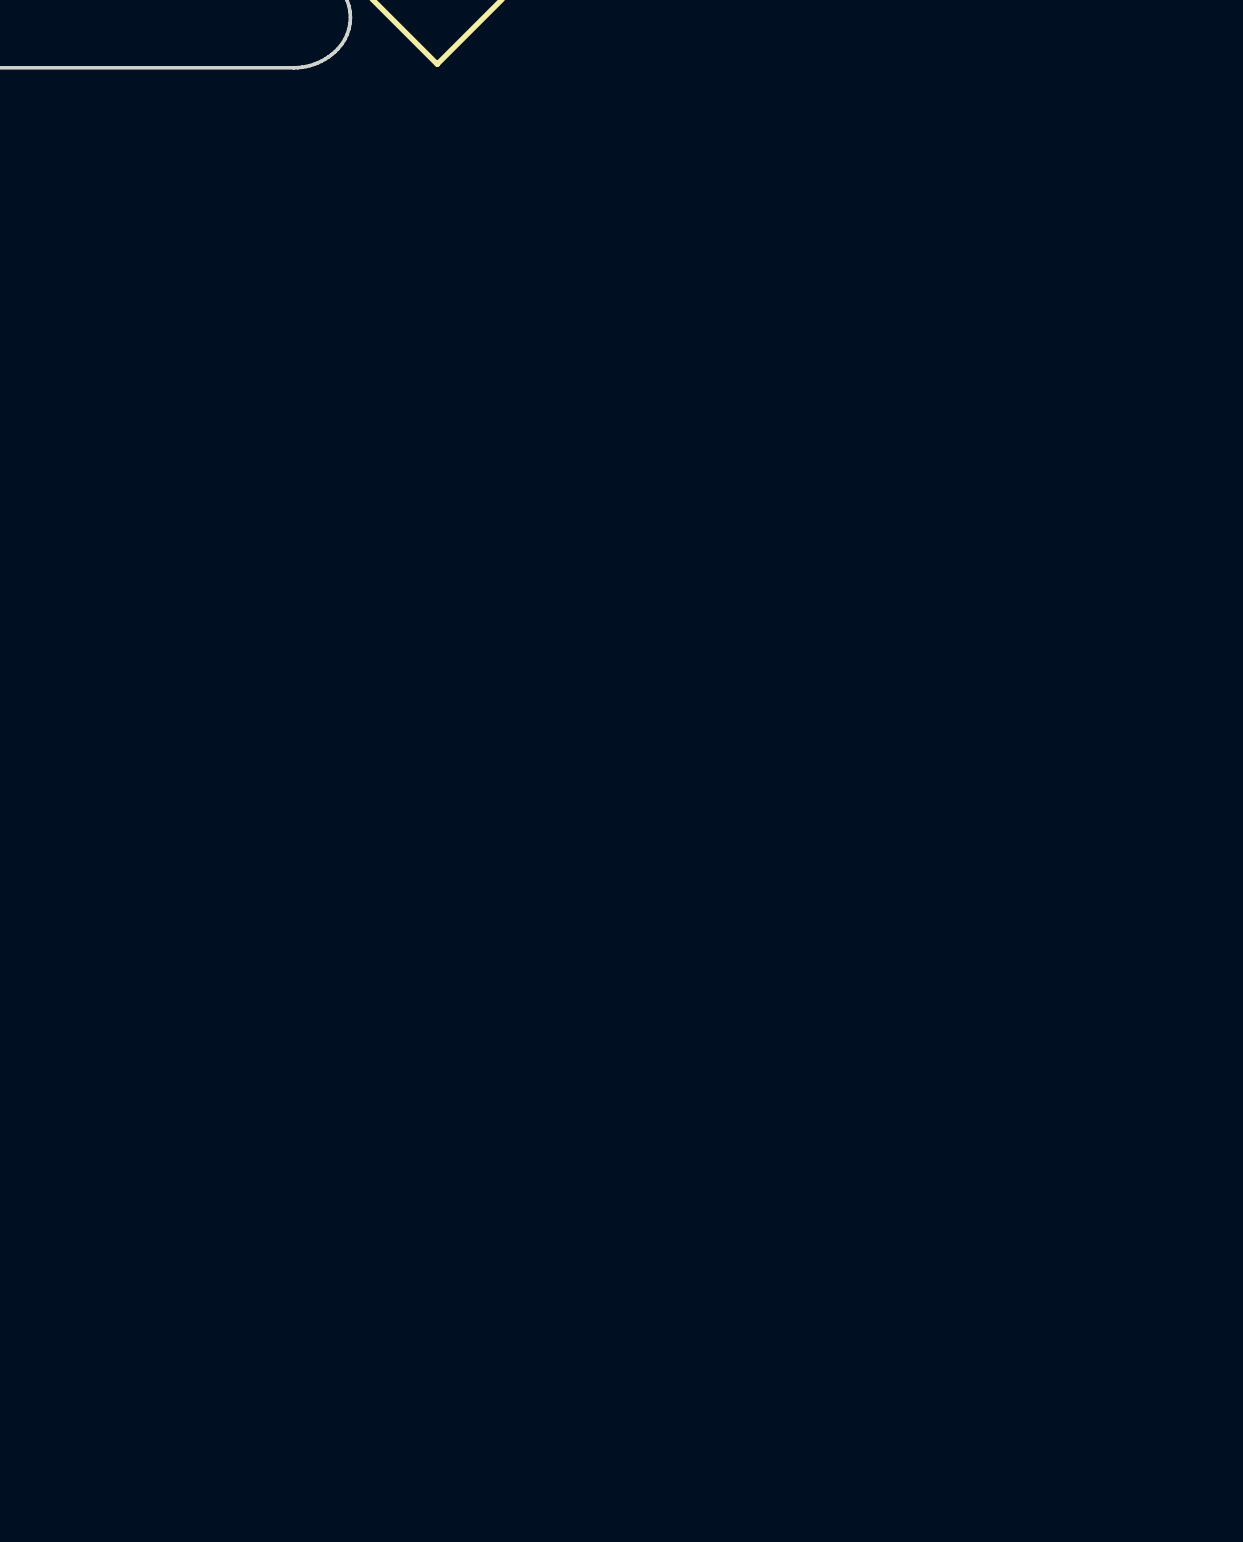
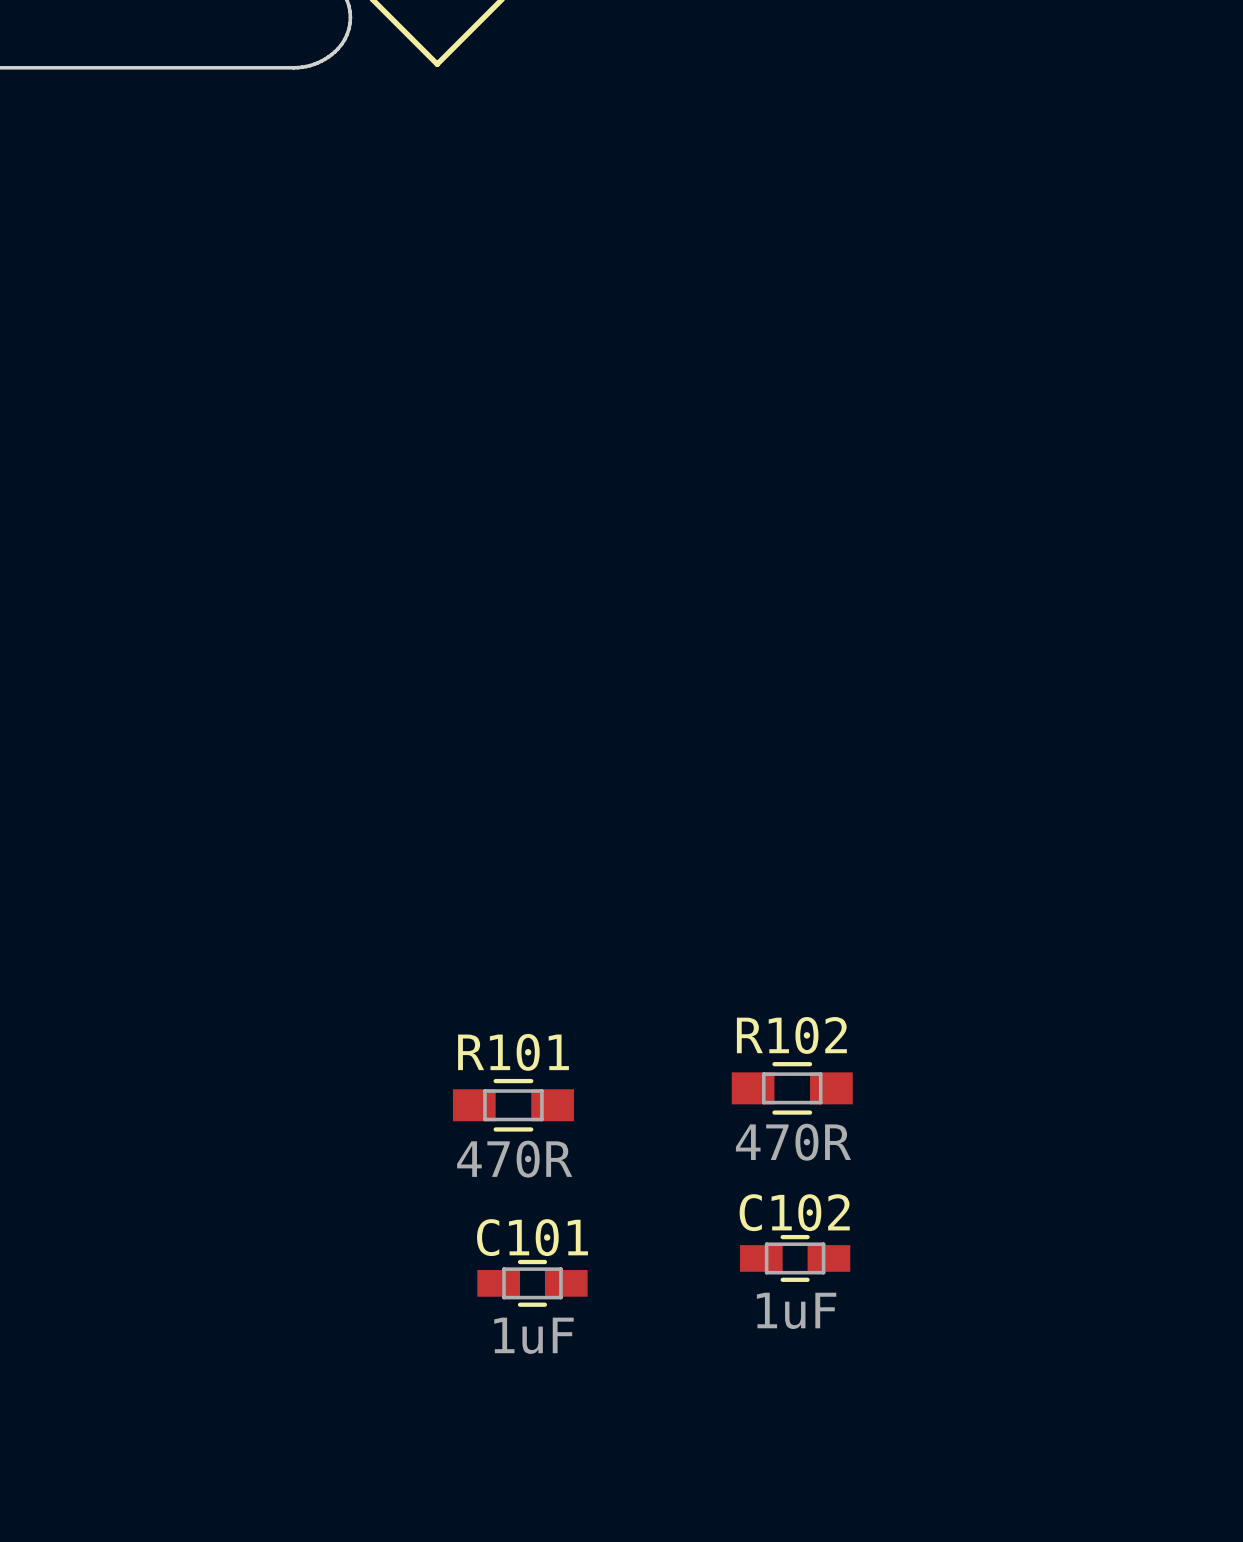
R102: none -> 470R (792, 1088)
R101: none -> 470R (513, 1105)
C102: none -> 1uF (795, 1258)
C101: none -> 1uF (532, 1283)

